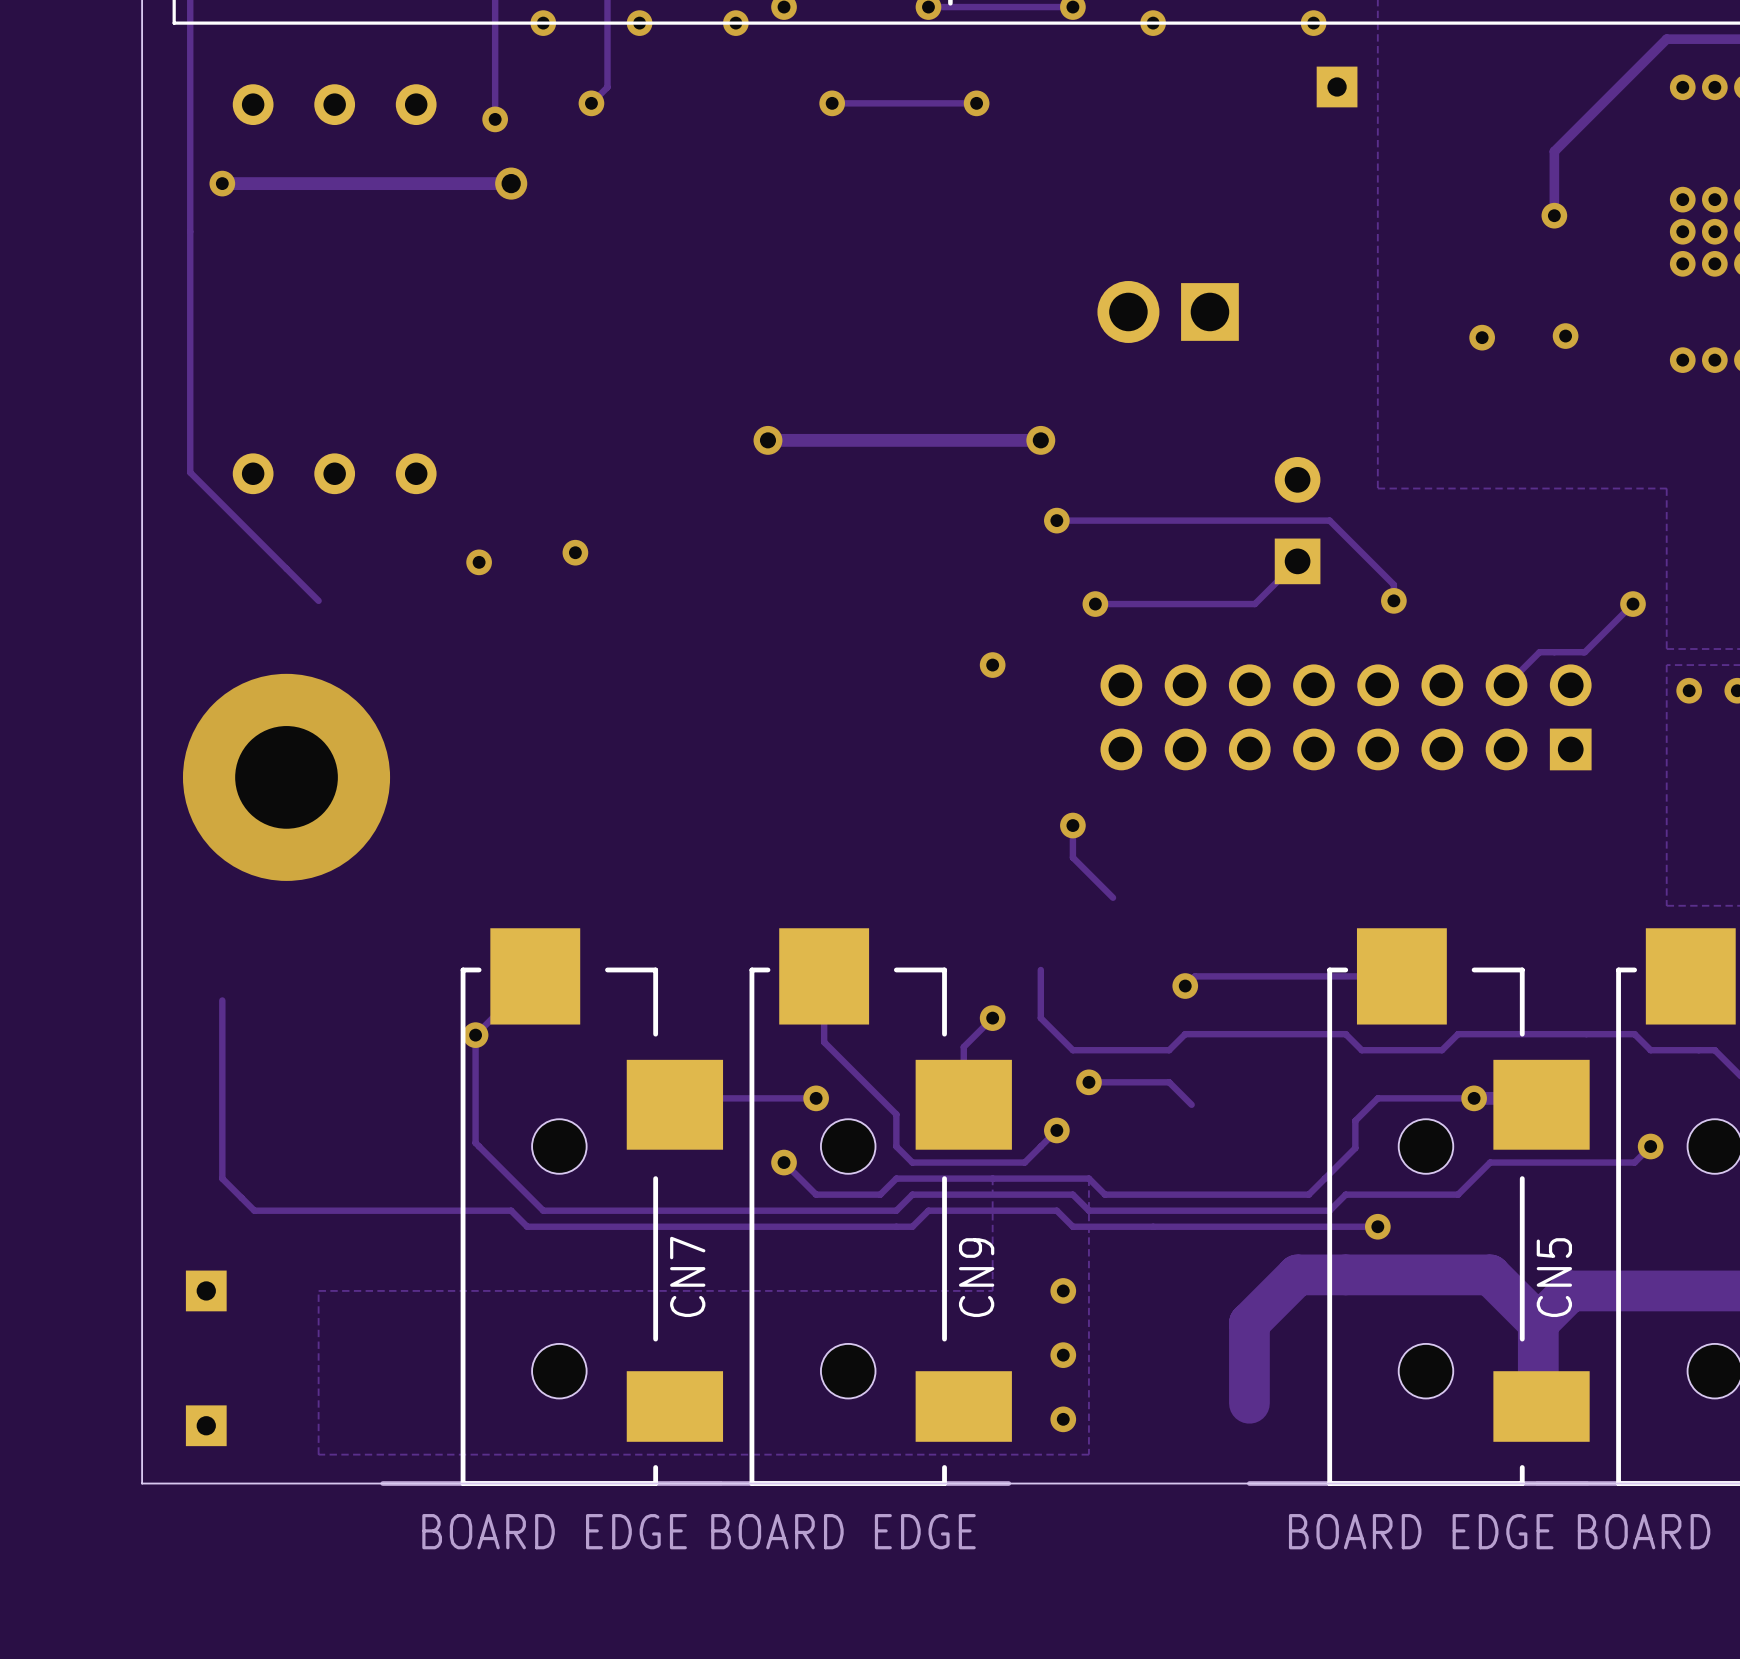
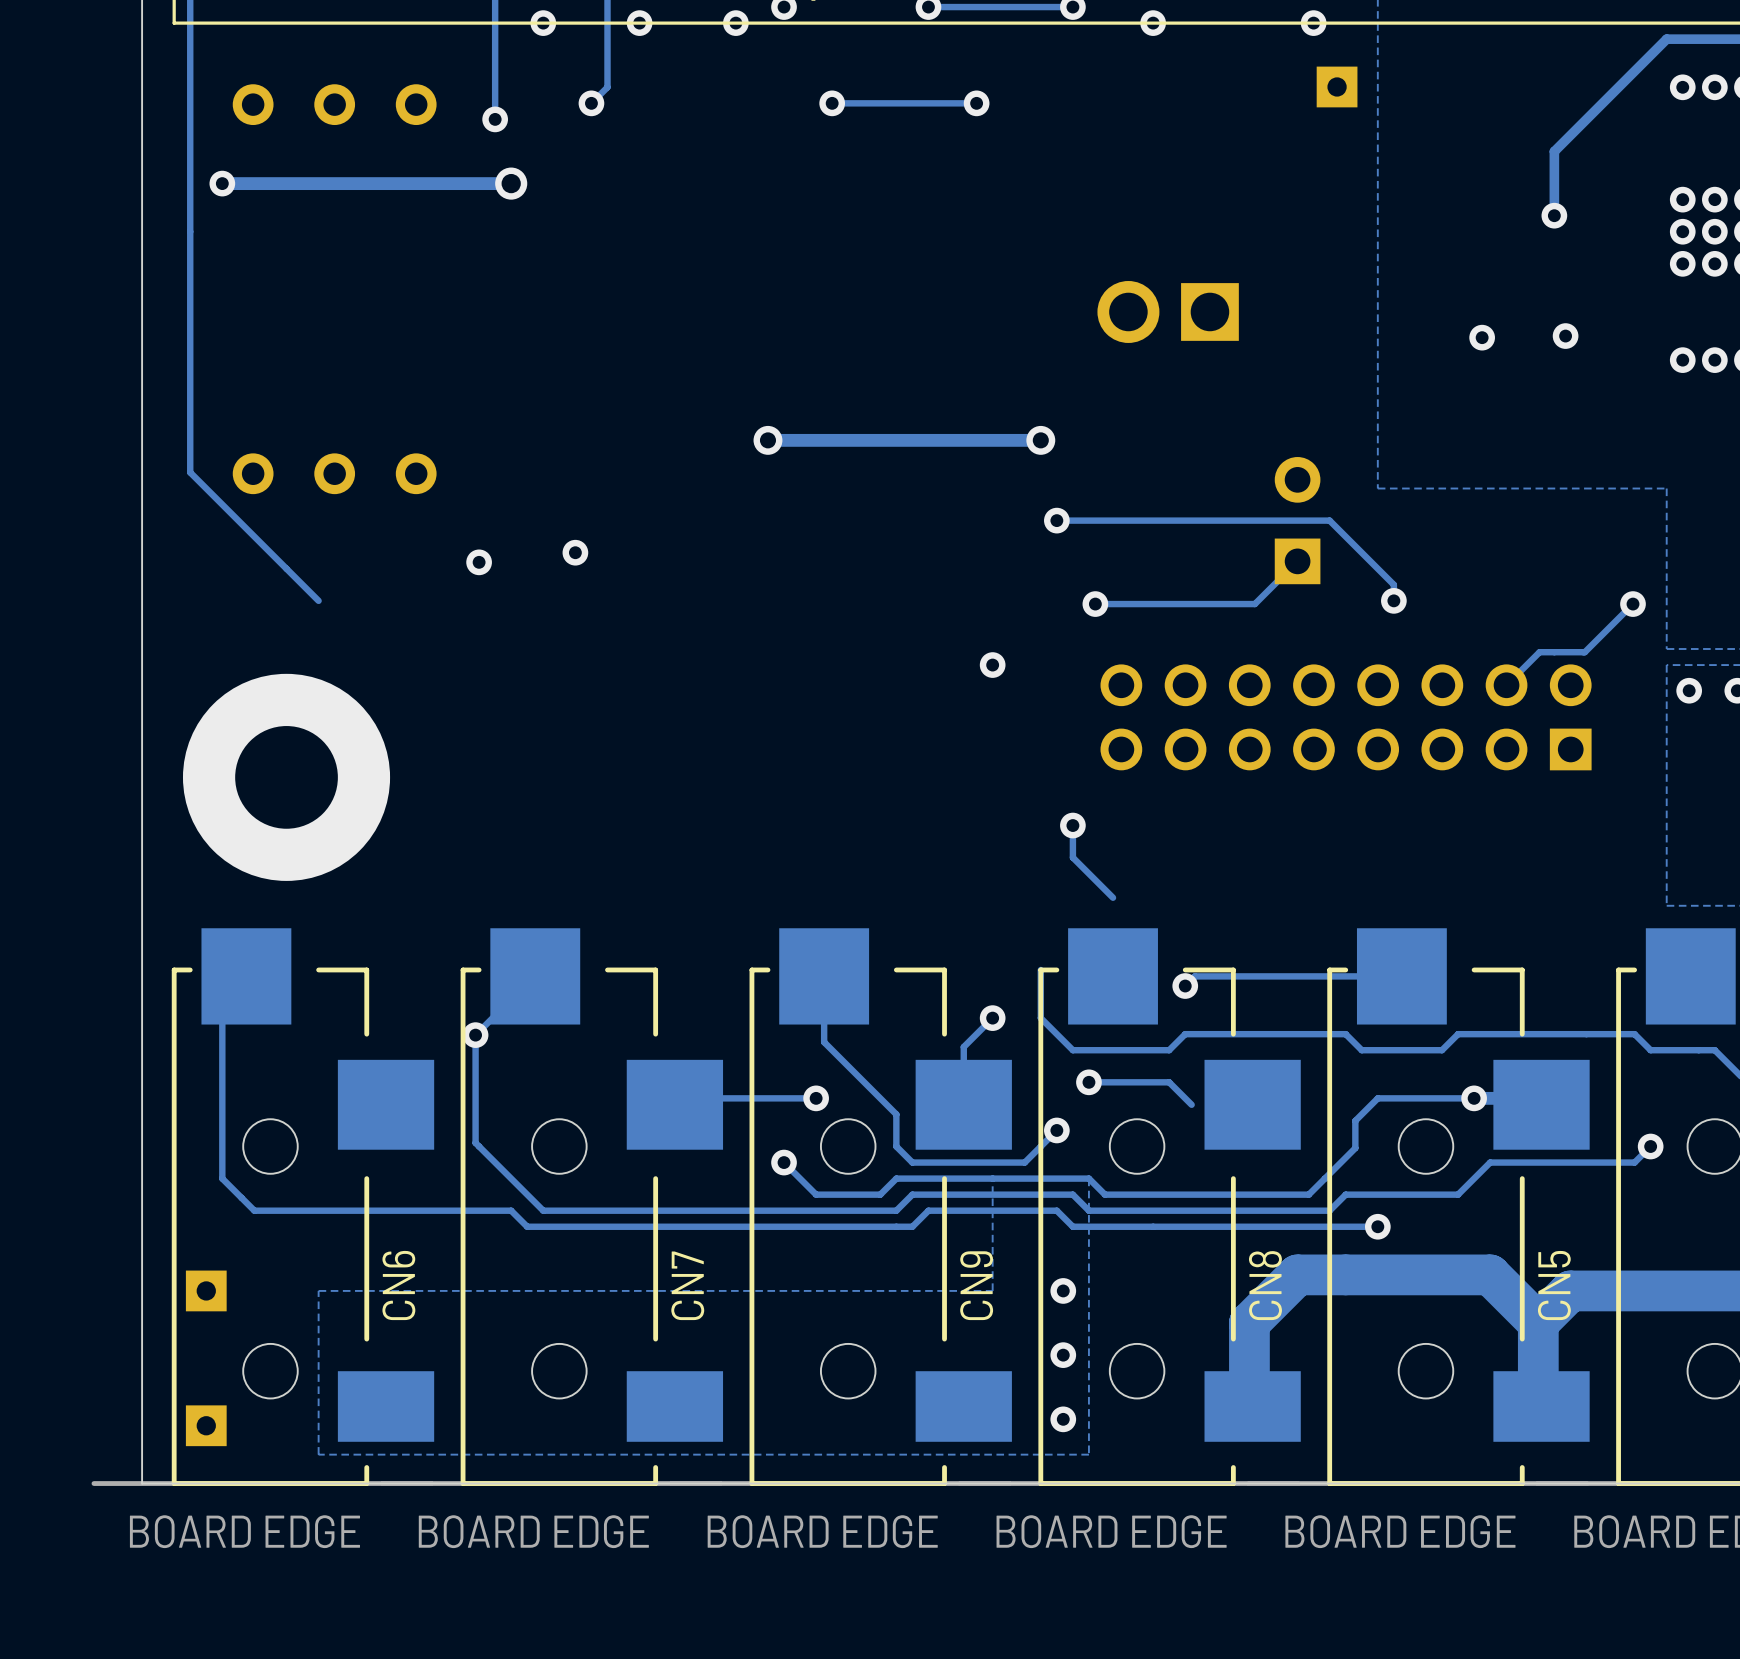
CN6: none -> (262, 1207)
CN8: none -> (1129, 1207)

